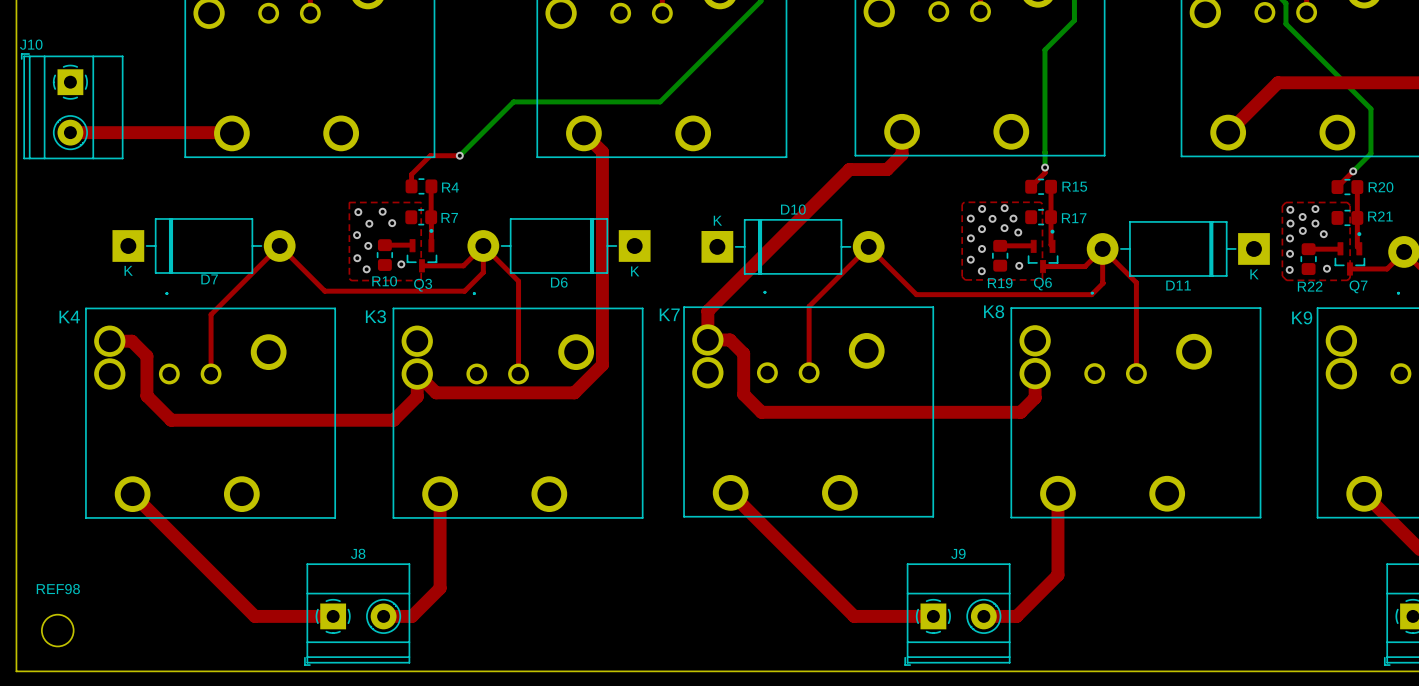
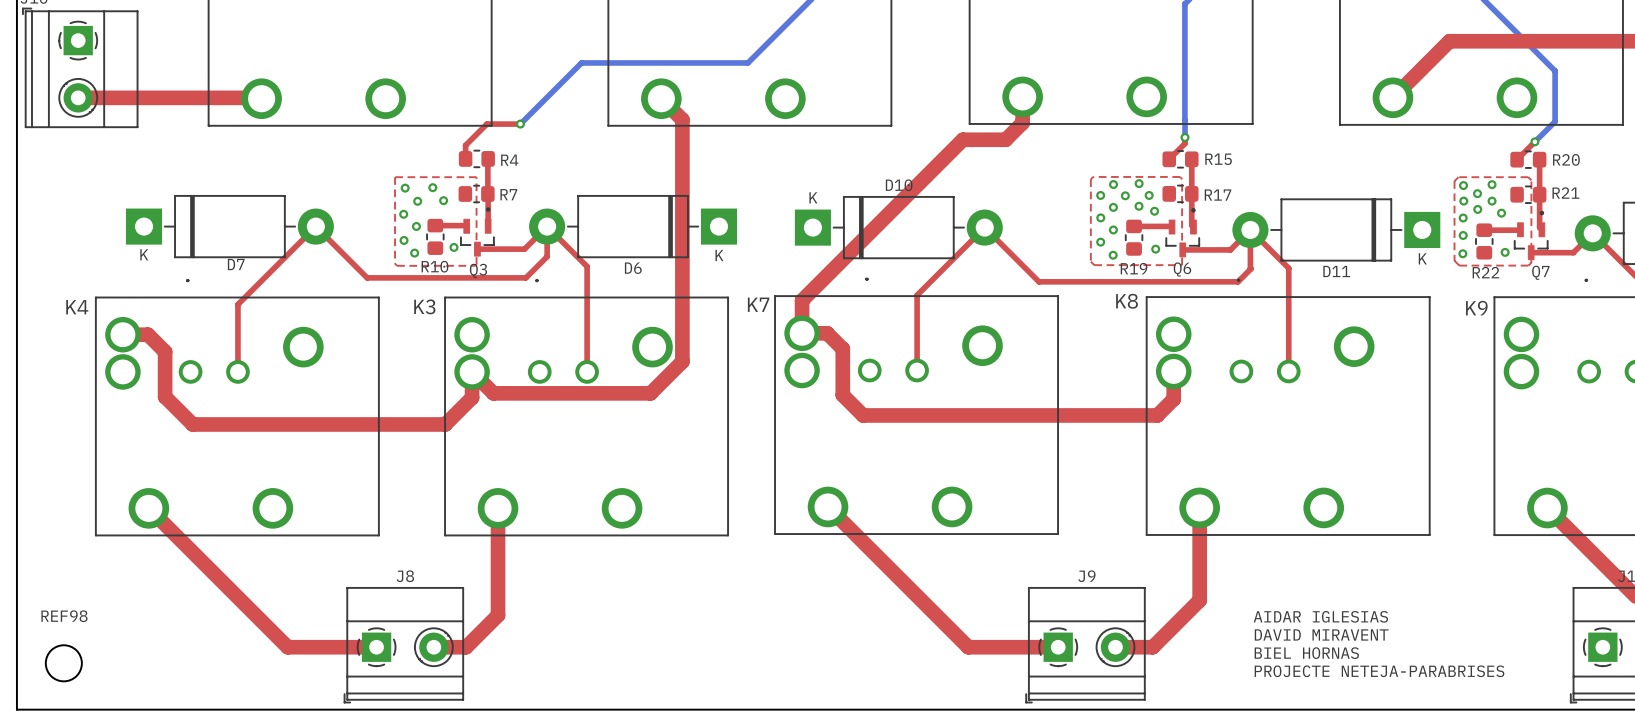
text: none -> AIDAR IGLESIAS (1320, 616)
text: none -> DAVID MIRAVENT (1321, 634)
text: none -> BIEL HORNAS (1306, 653)
text: none -> PROJECTE NETEJA-PARABRISES (1379, 671)

